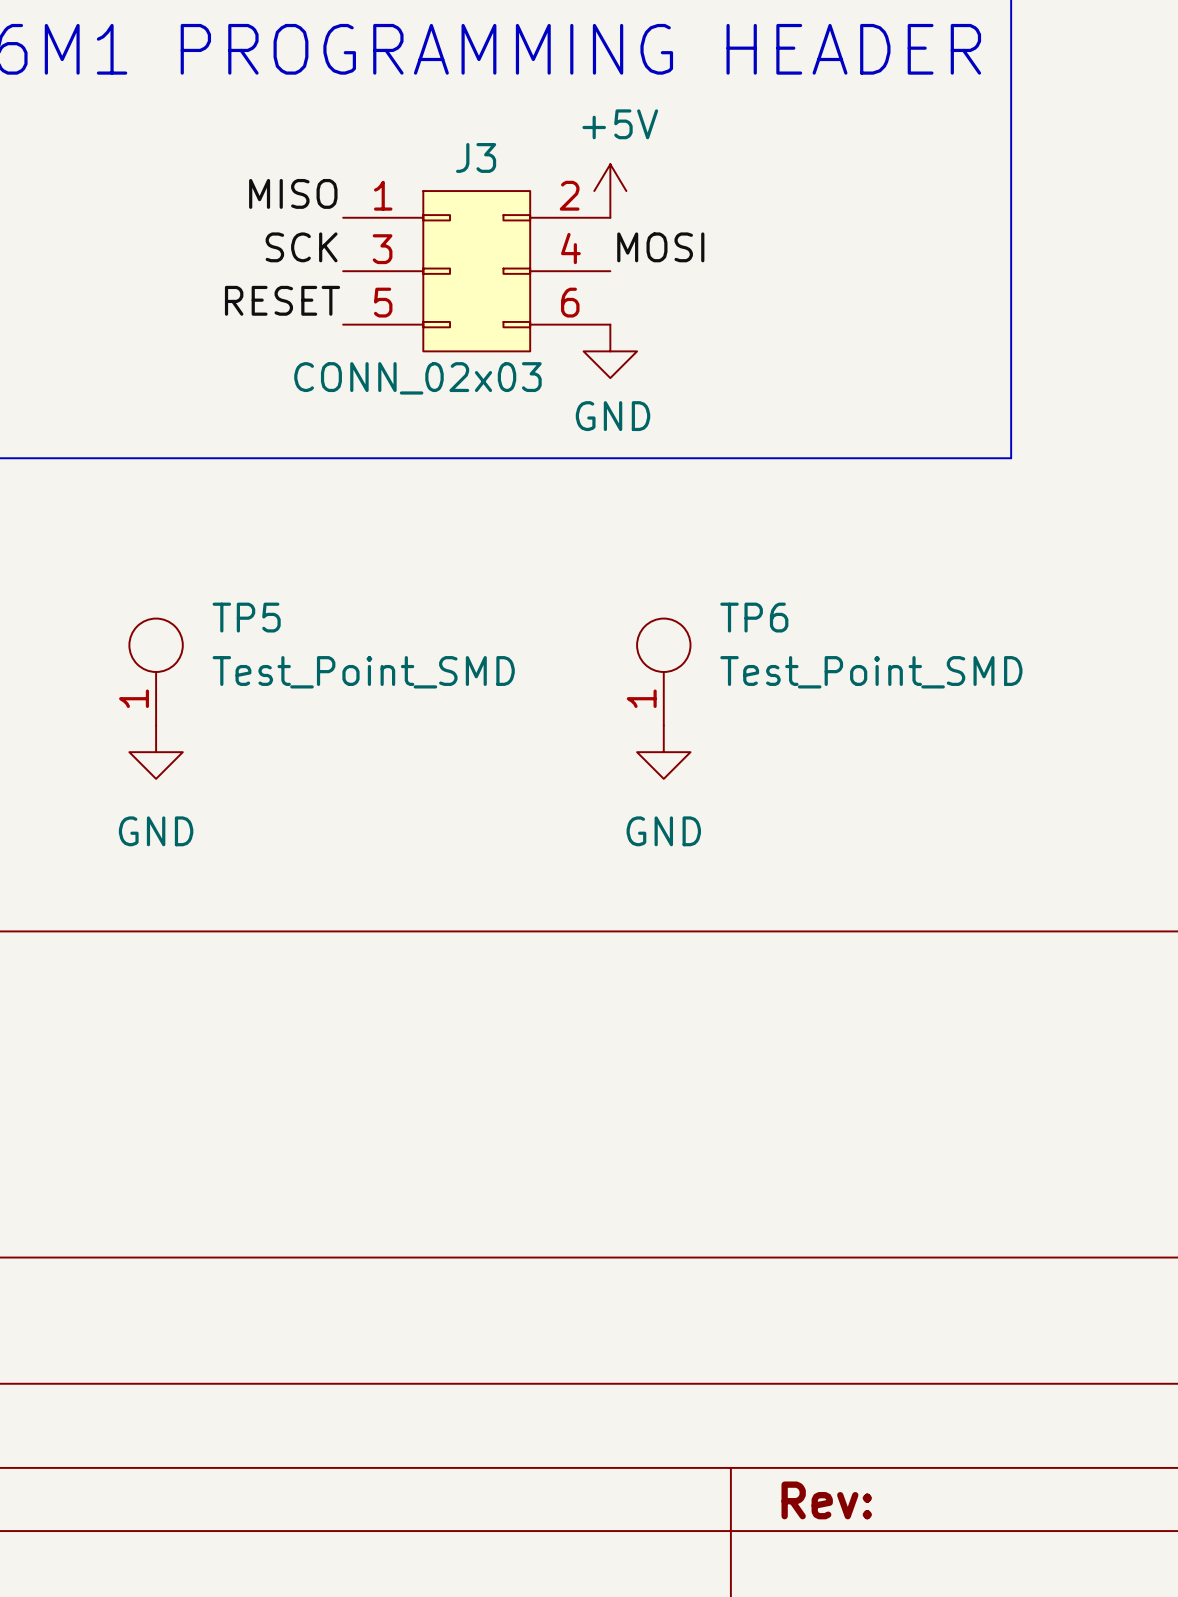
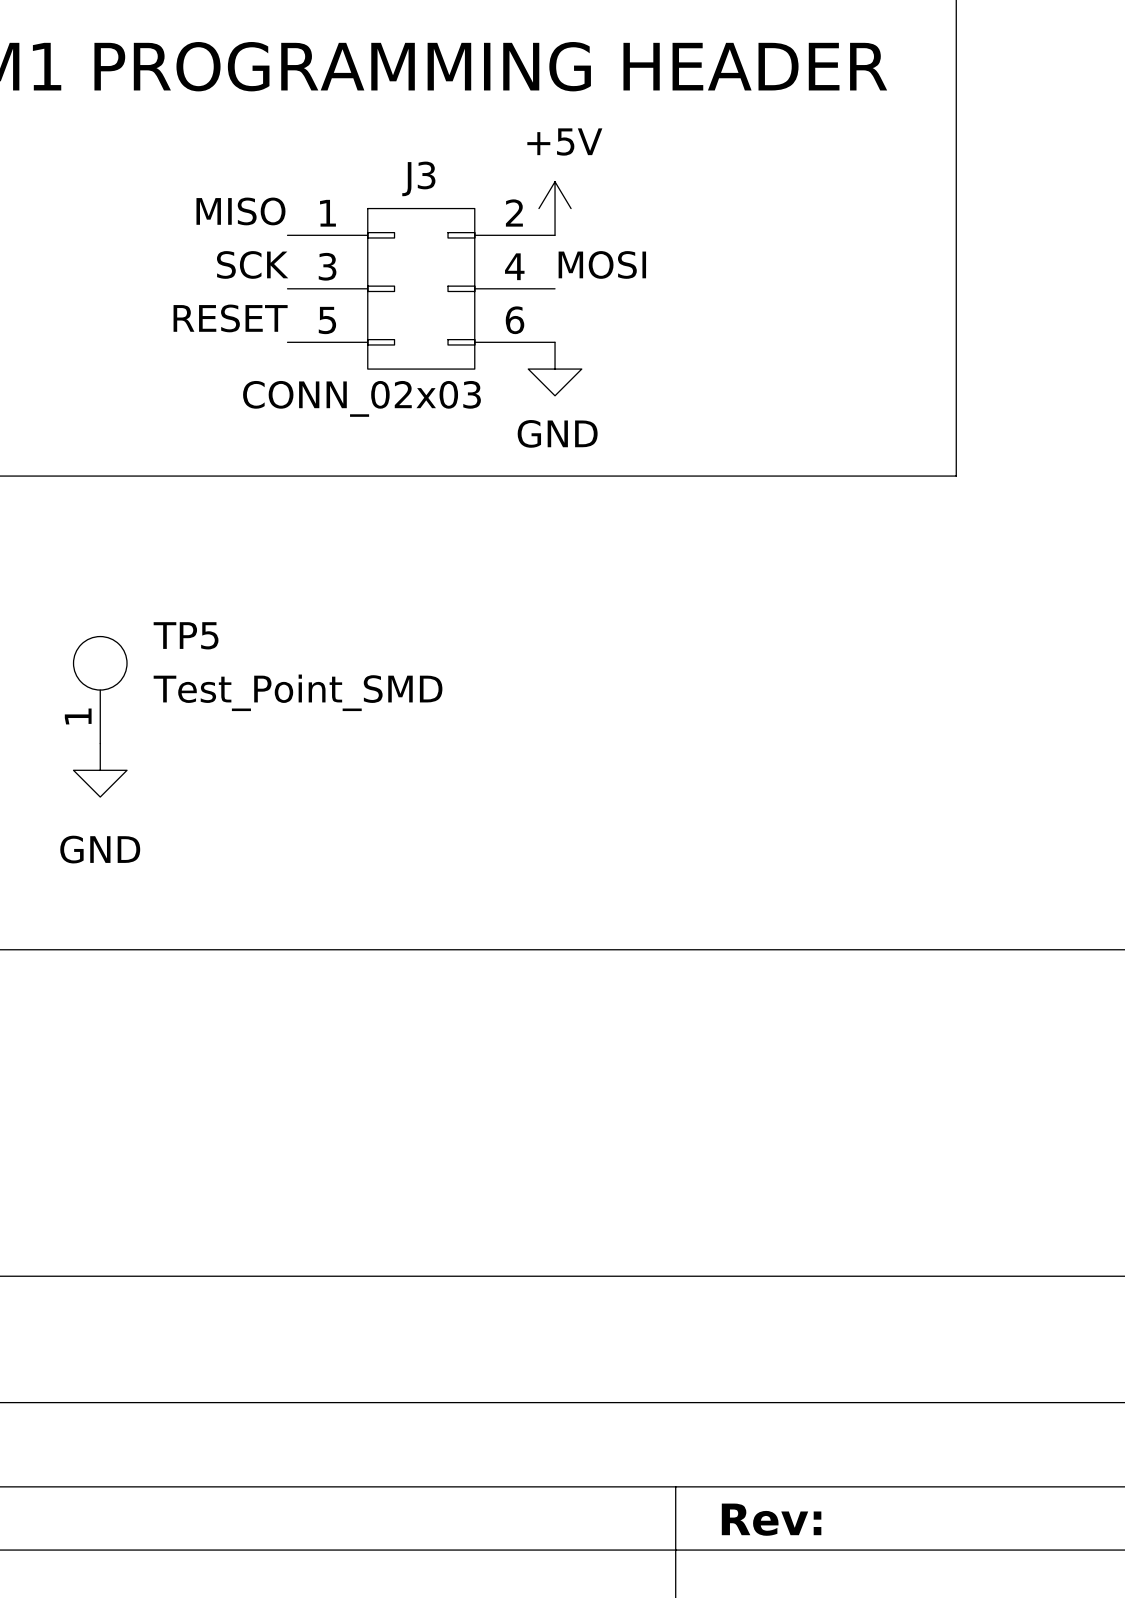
TP6: Test_Point_SMD (663, 672) -> none
power symbol: GND (663, 752) -> none

